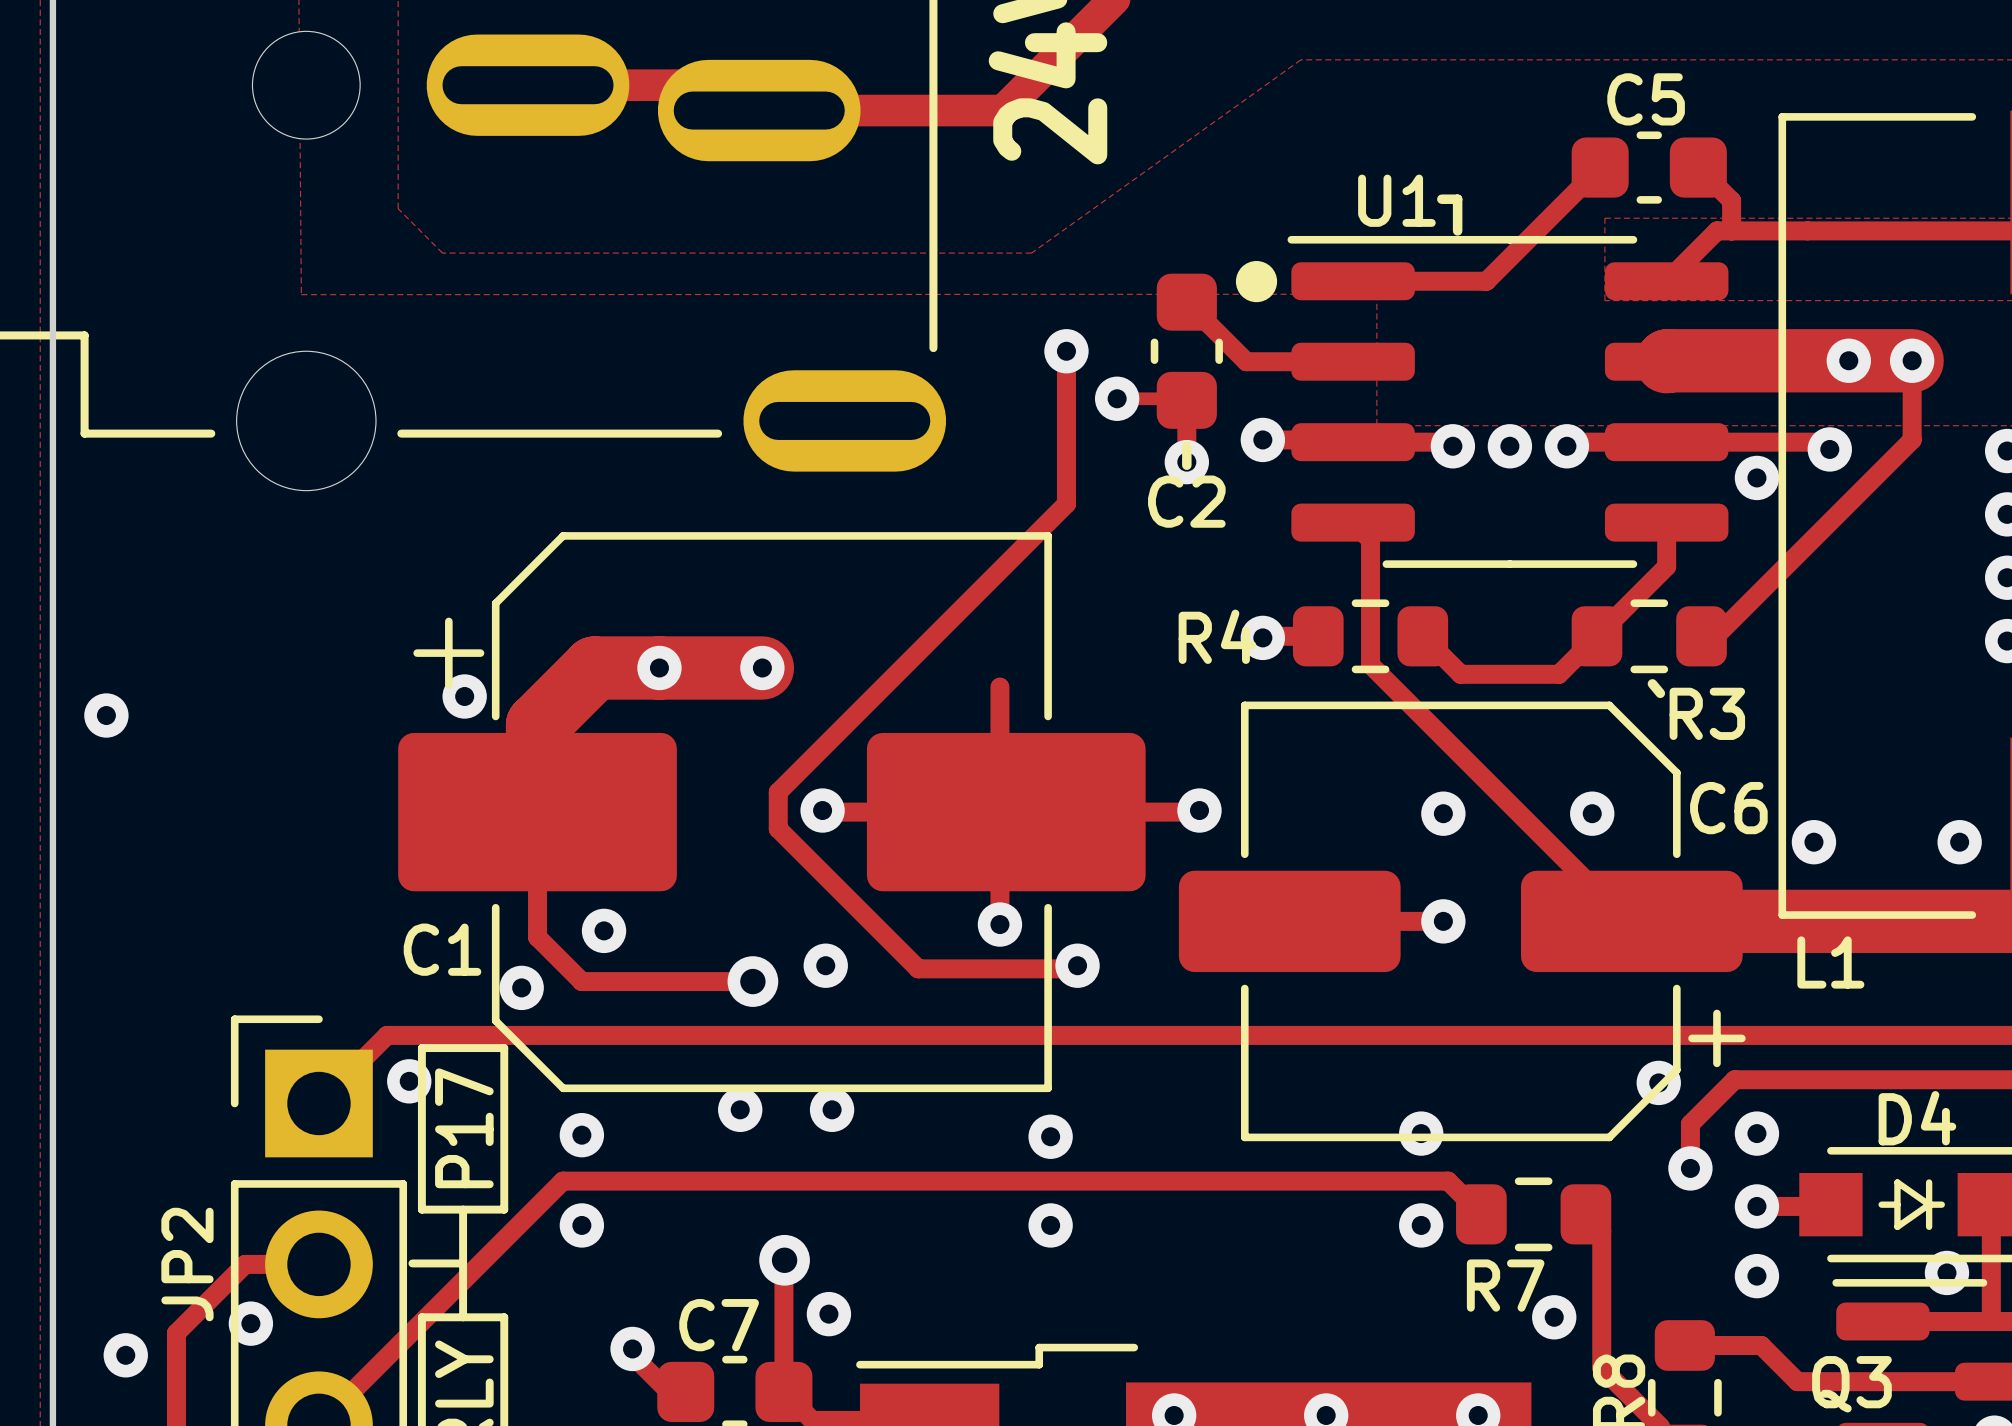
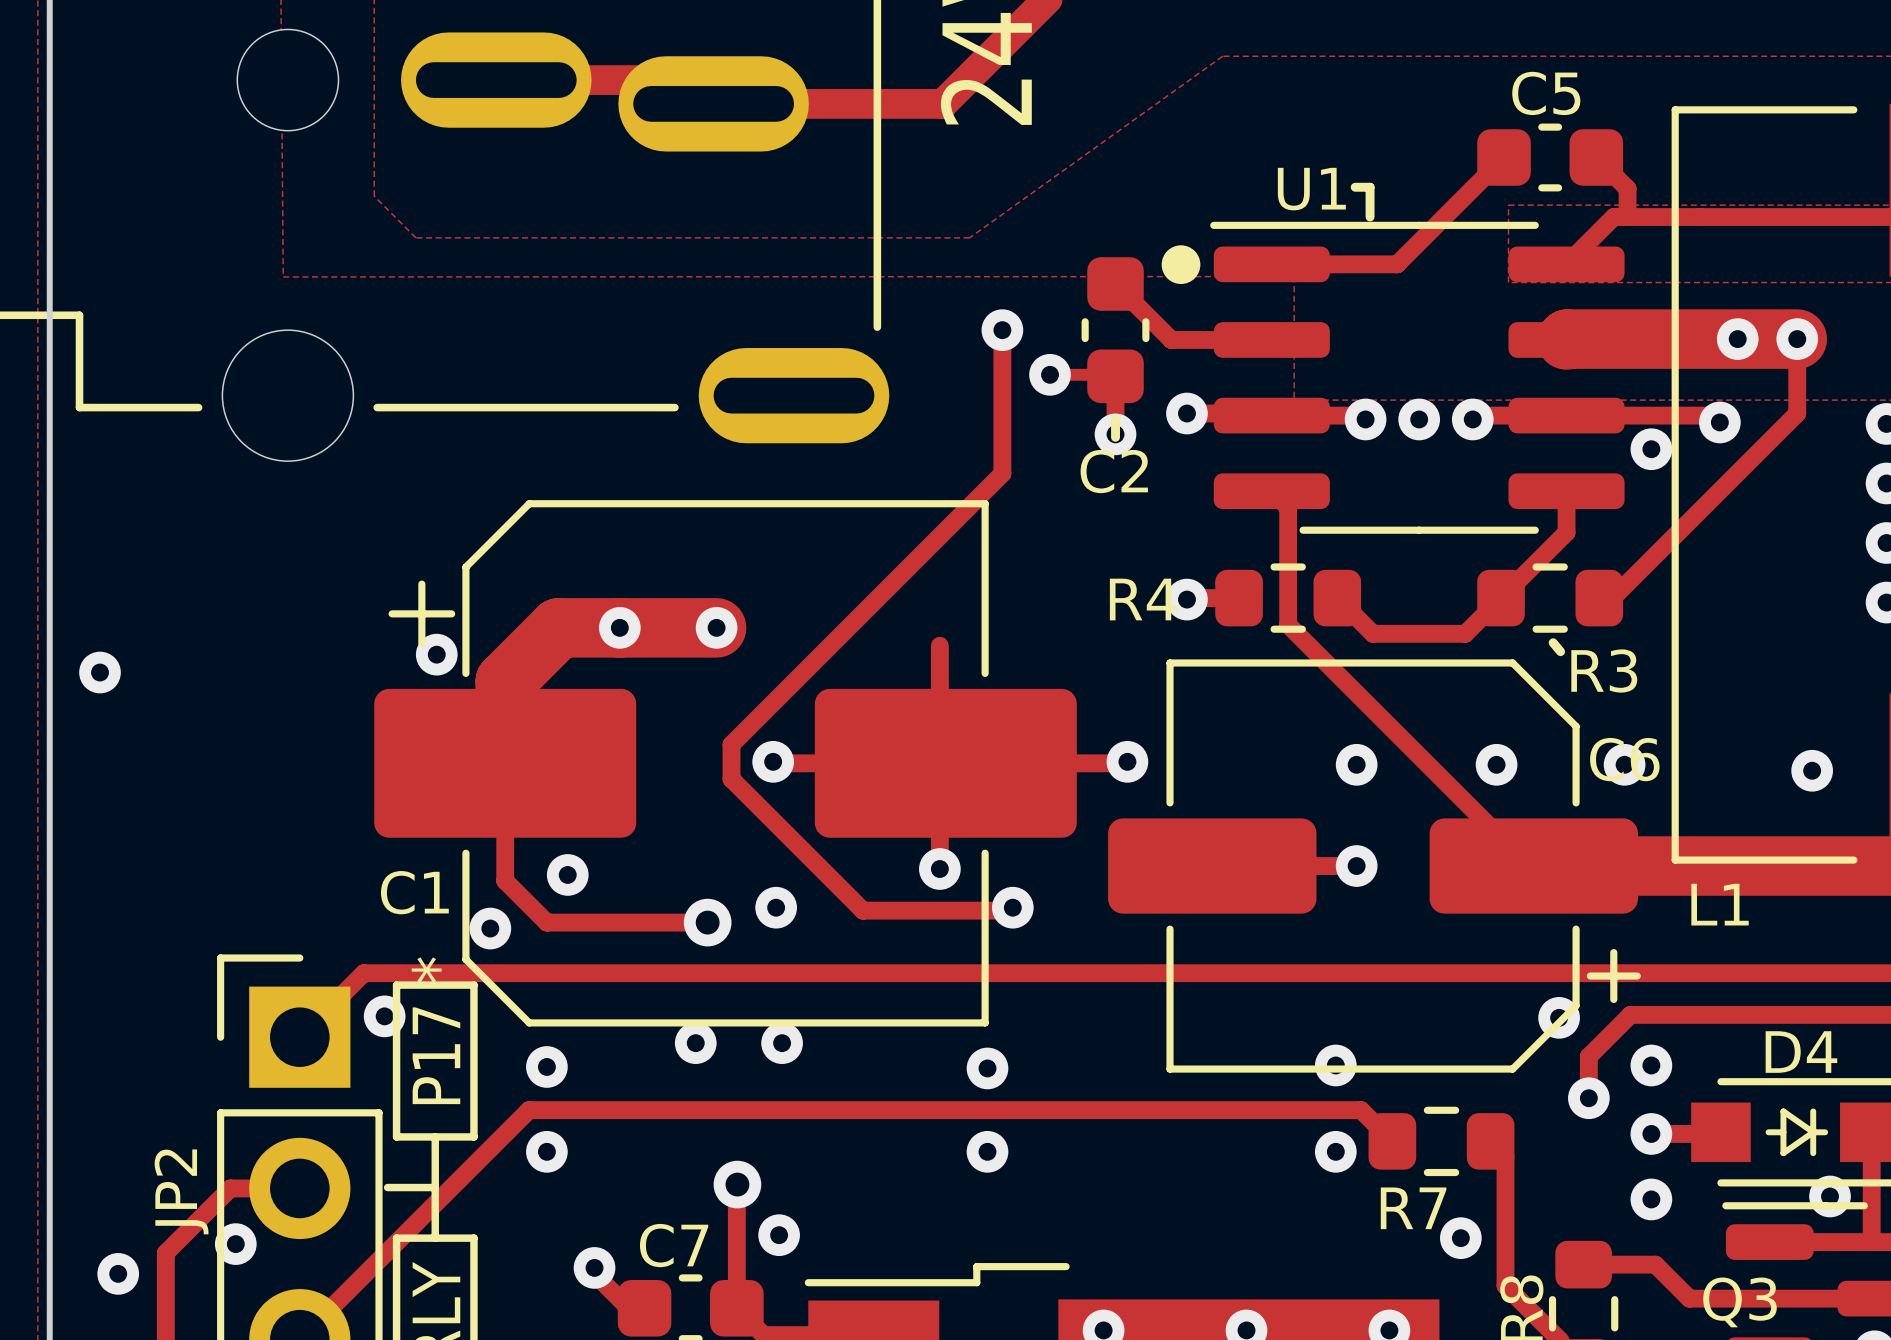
via: none -> (1624, 764)
via: (1813, 842) -> none
via position: (1959, 842) -> (1812, 770)
text: P17 (464, 1128) -> P17 * (436, 1030)

